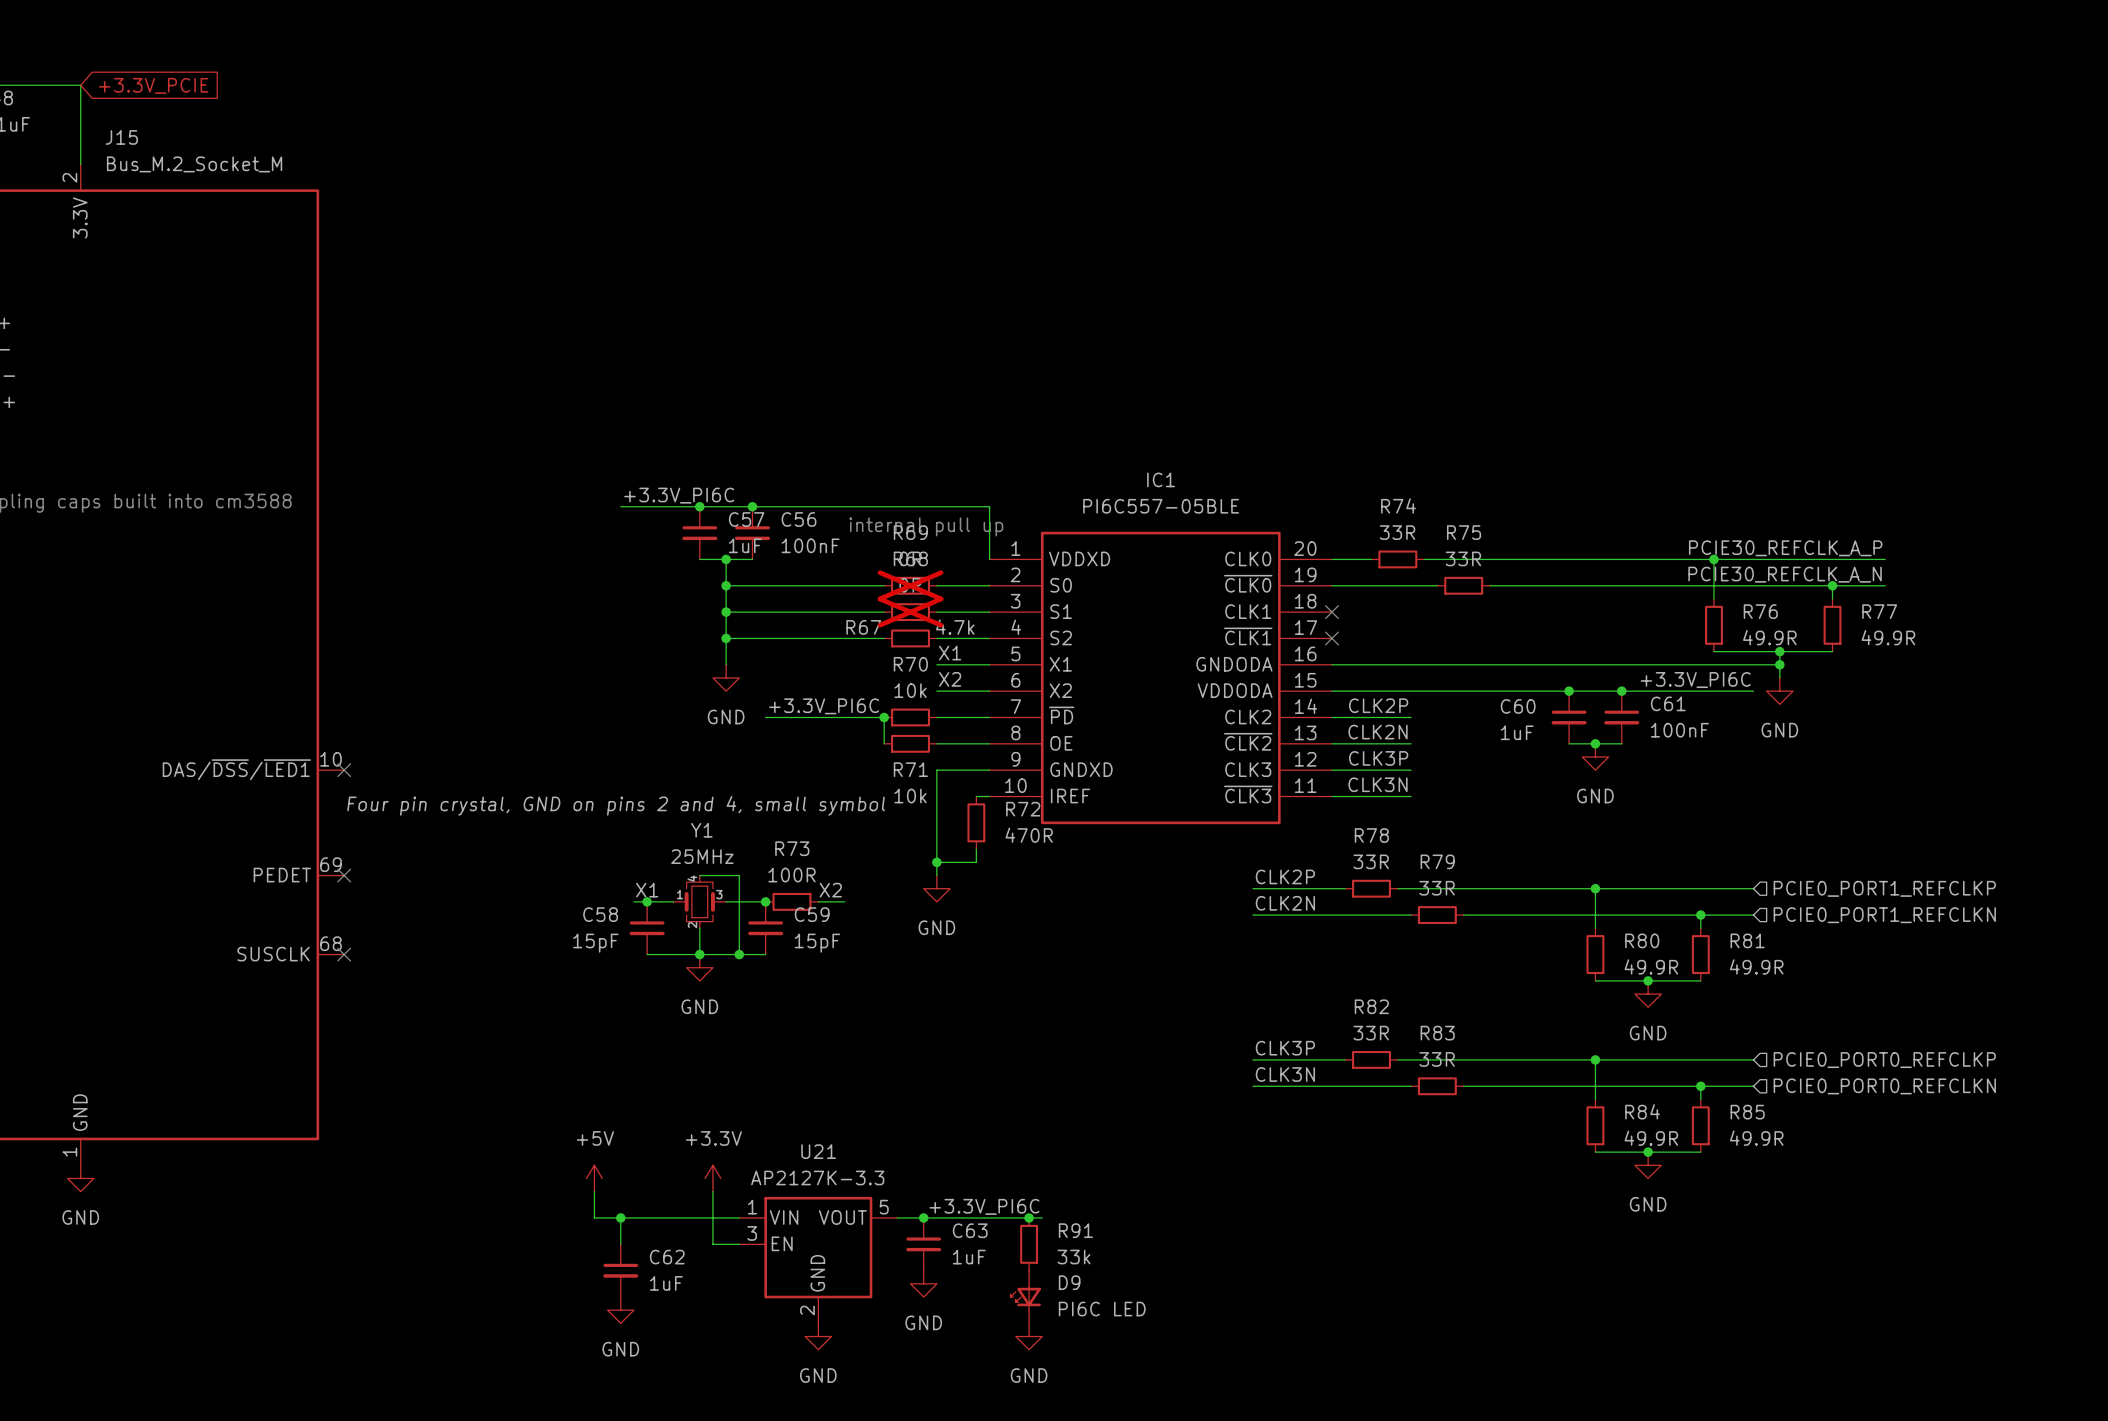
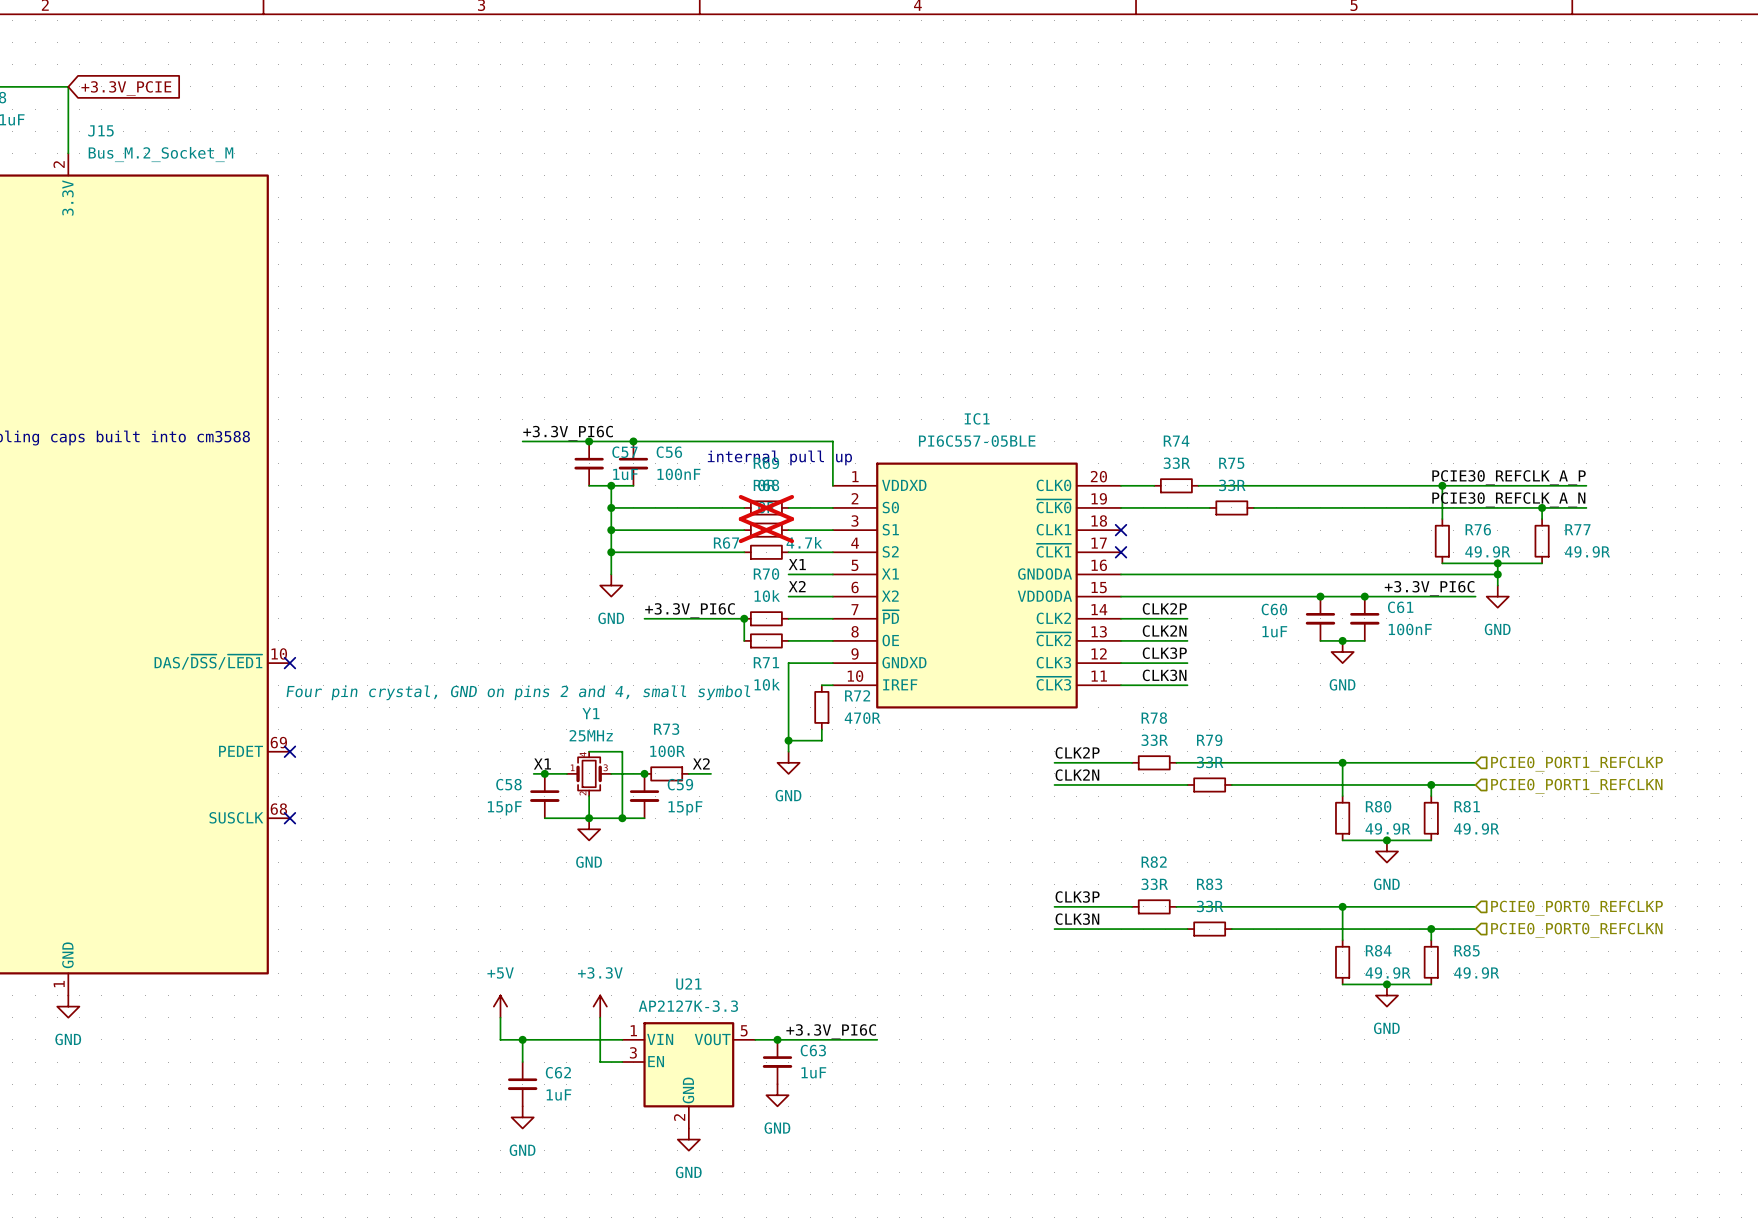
junction: (1029, 1217) -> none
R91: 33k (1029, 1244) -> none
D9: PI6C LED (1025, 1297) -> none
power symbol: GND (1029, 1336) -> none

